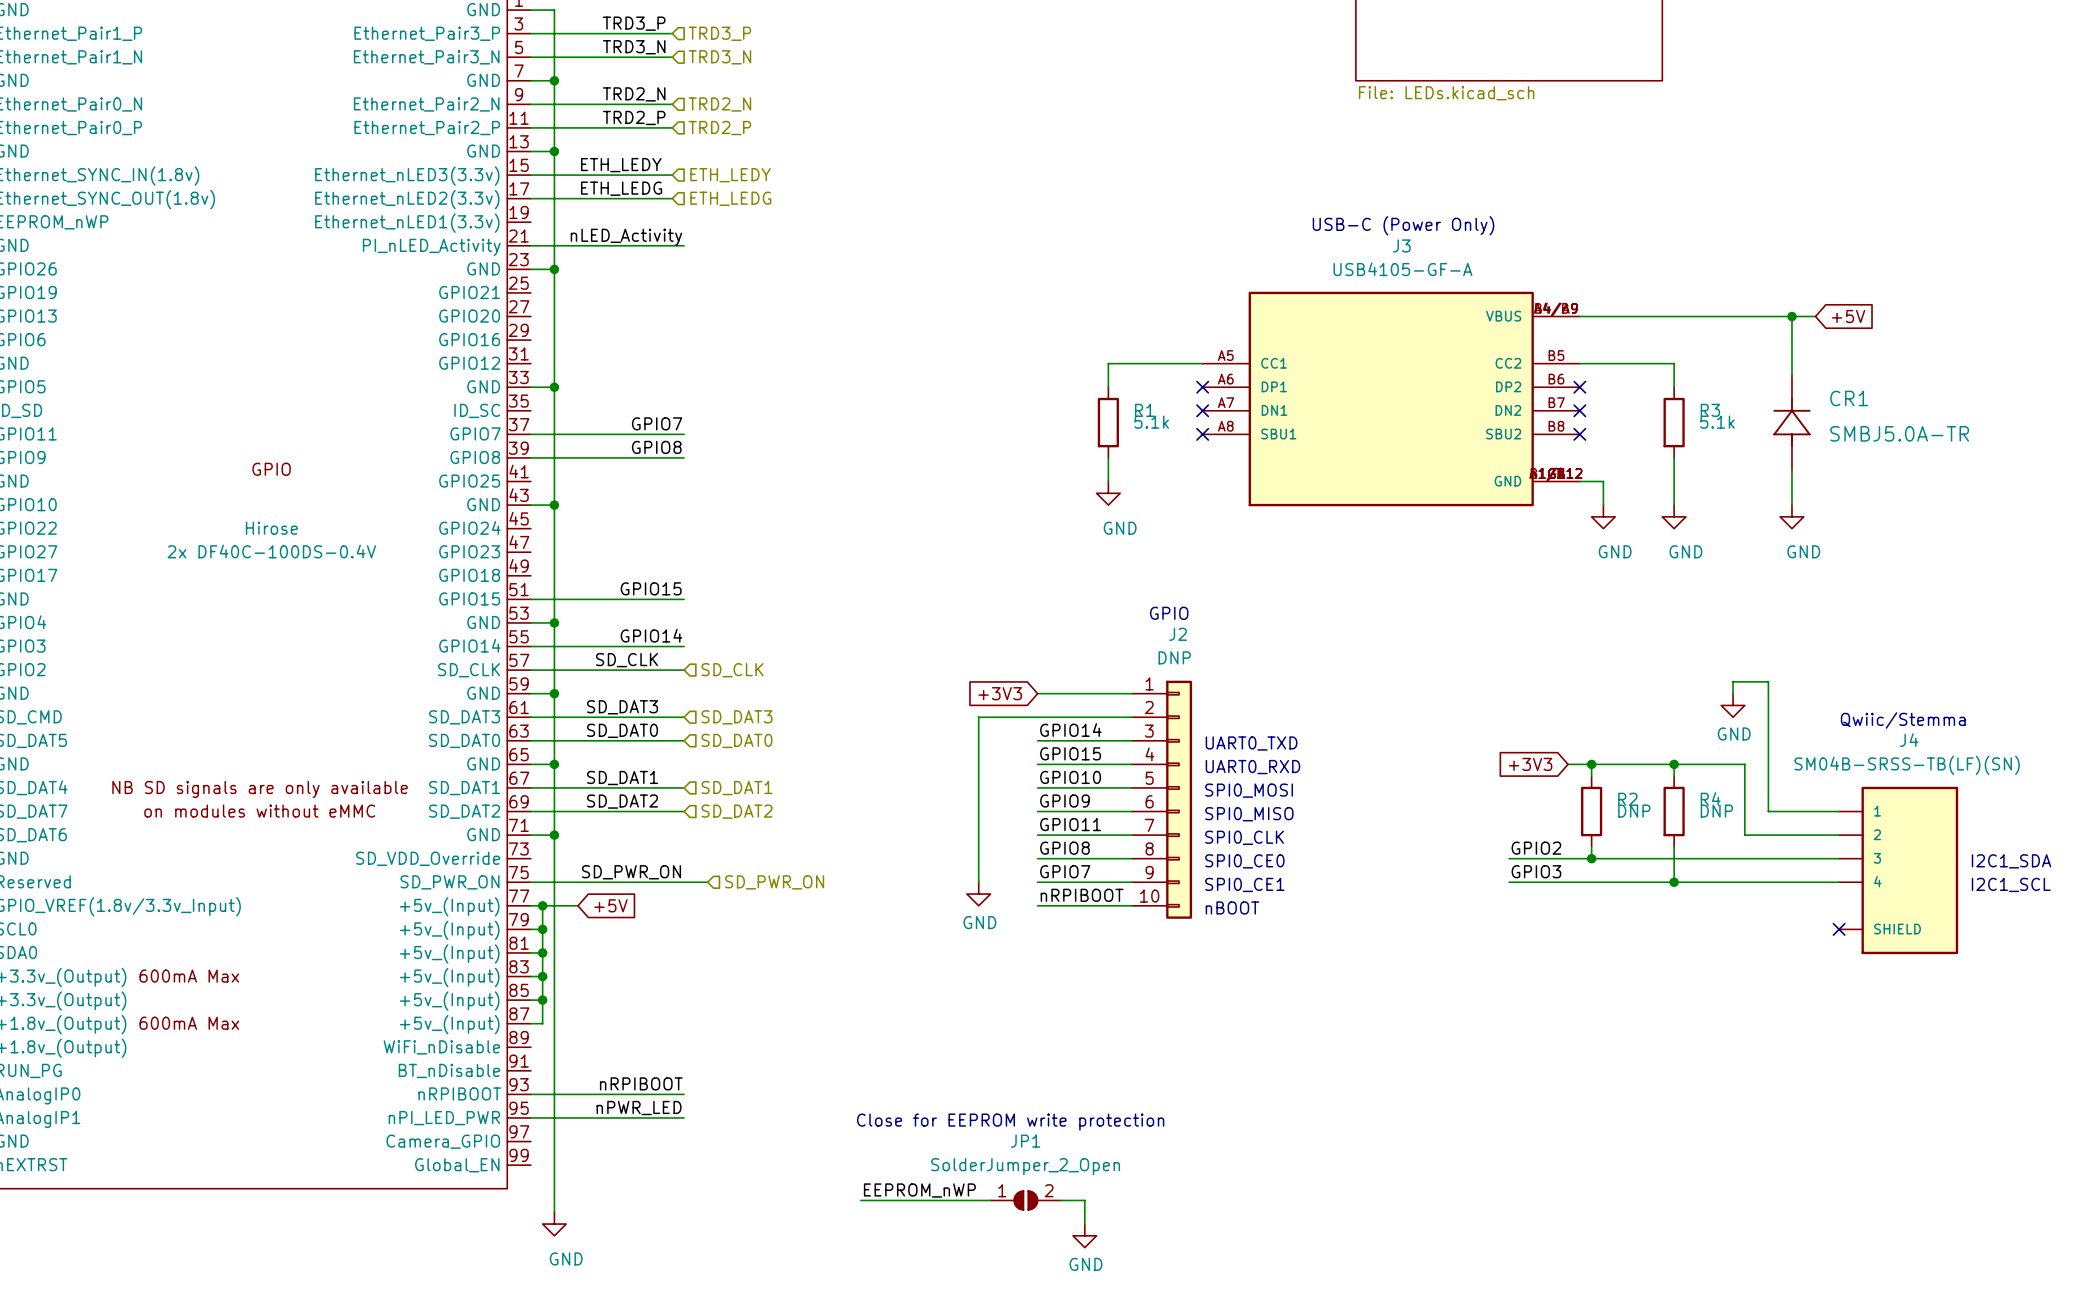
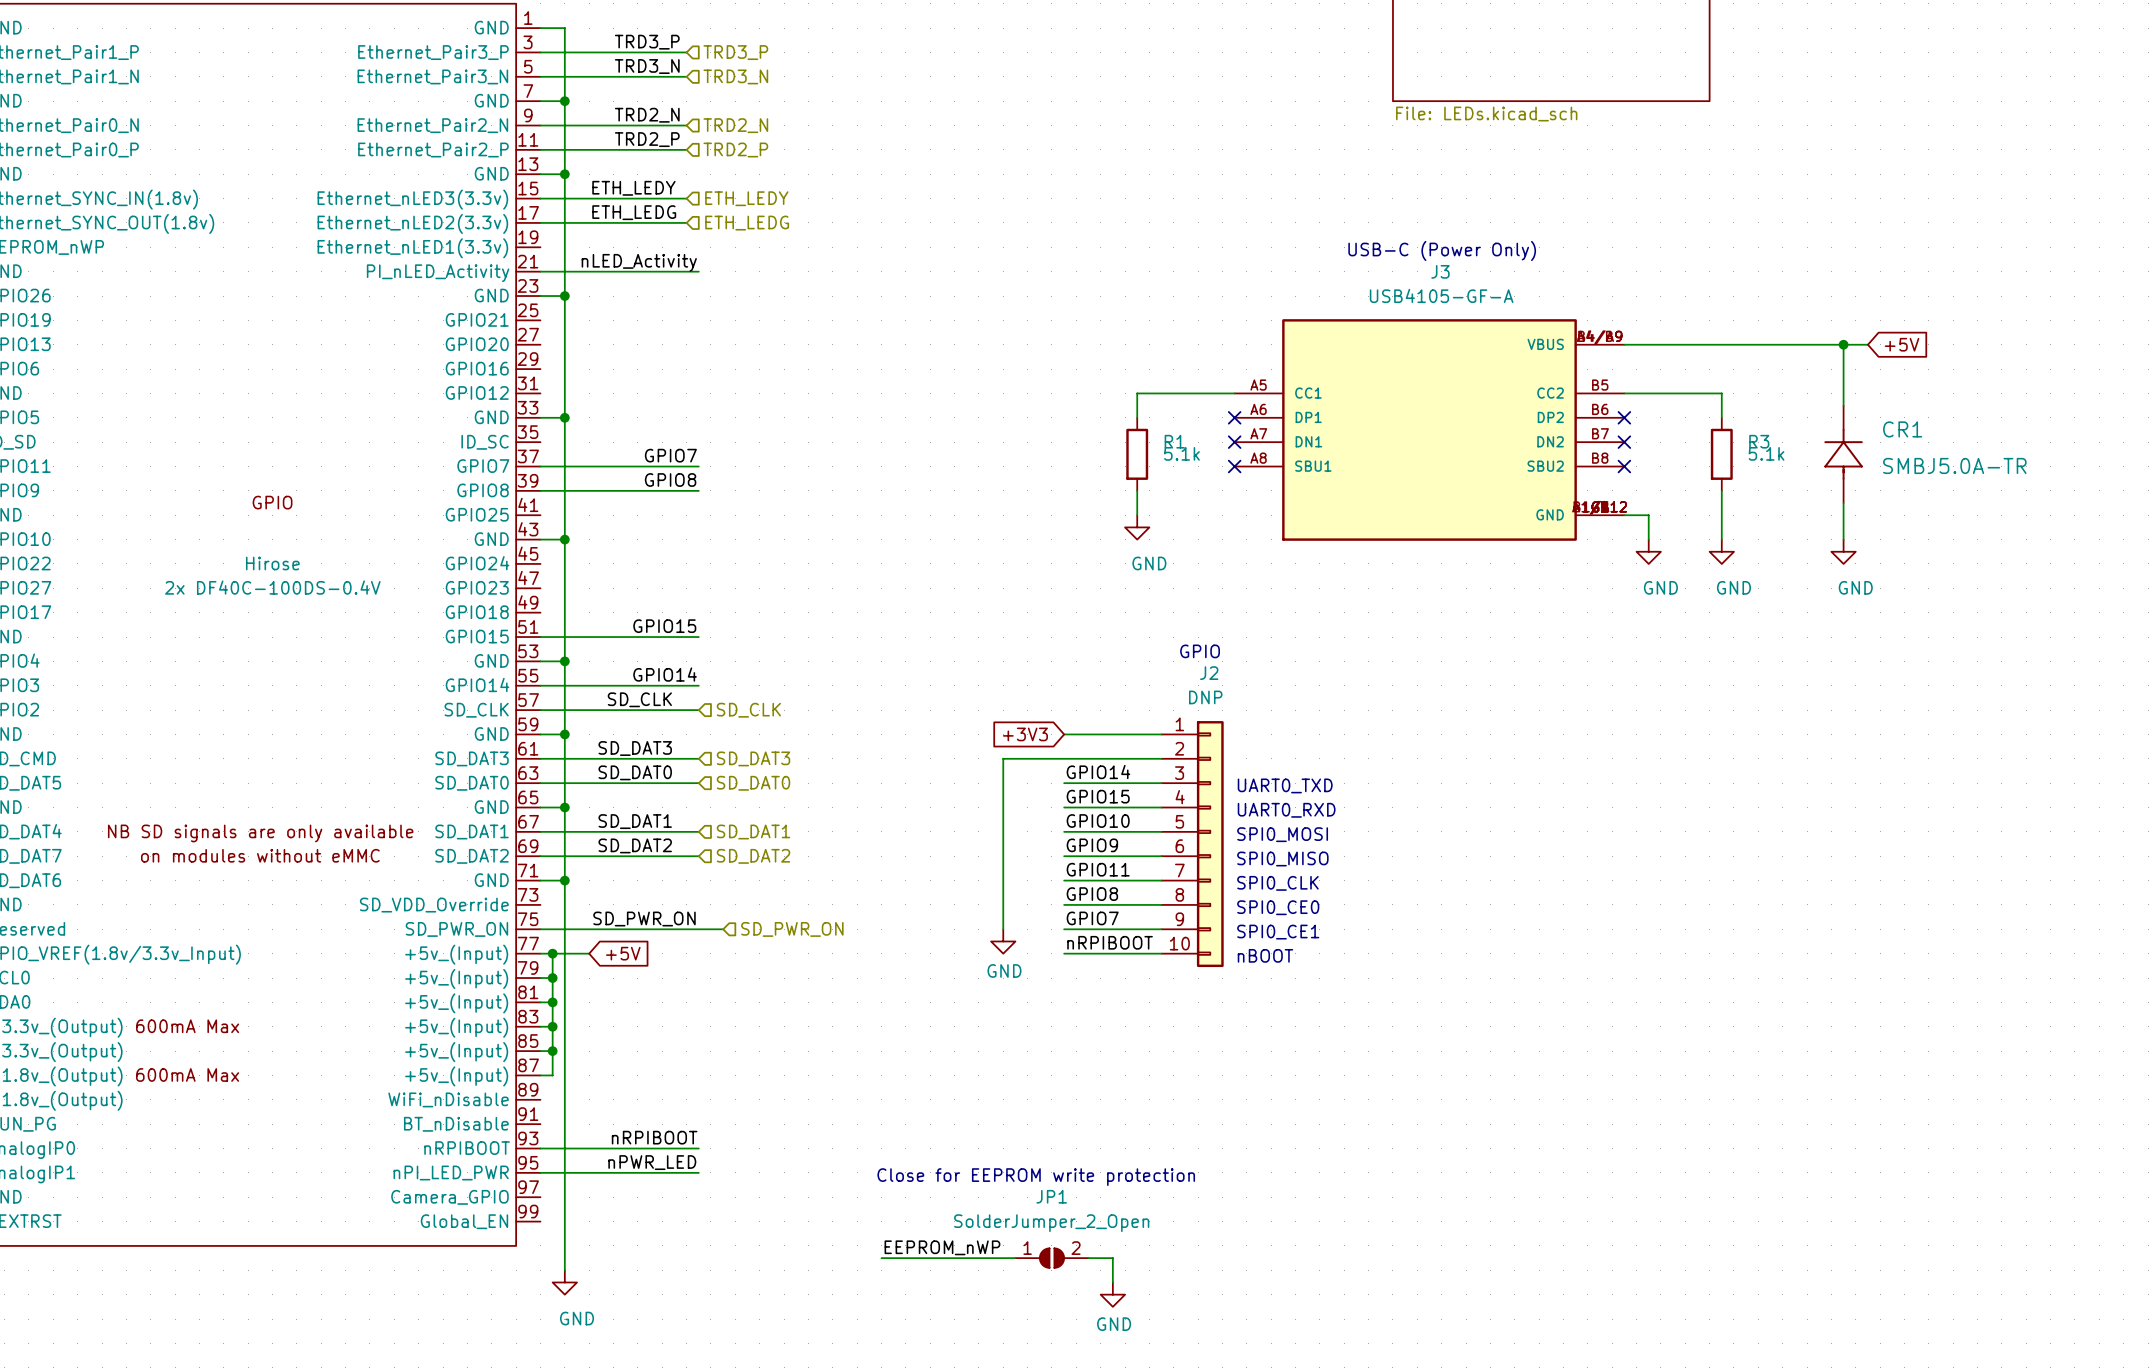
wire: (1733, 693) (1733, 681) (1768, 681) (1768, 811) (1839, 811) -> none
power symbol: GND (1733, 705) -> none
text: Qwiic/Stemma (1903, 720) -> none
global label: +3V3 (1530, 764) -> none
wire: (1568, 764) (1744, 764) (1744, 835) (1839, 835) -> none
wire: (1591, 764) (1591, 776) -> none
junction: (1591, 764) -> none
wire: (1674, 764) (1674, 776) -> none
junction: (1674, 764) -> none
R2: DNP (1591, 811) -> none
R4: DNP (1674, 811) -> none
wire: (1591, 846) (1591, 858) -> none
wire: (1674, 846) (1674, 882) -> none
label: GPIO2 (1536, 848) -> none
wire: (1509, 858) (1839, 858) -> none
junction: (1591, 858) -> none
text: I2C1_SDA (2011, 861) -> none
J4: SM04B-SRSS-TB(LF)(SN) (1898, 870) -> none
label: GPIO3 (1536, 871) -> none
wire: (1509, 882) (1839, 882) -> none
junction: (1674, 882) -> none
text: I2C1_SCL (2011, 884) -> none
no-connect mark: (1839, 929) -> none

